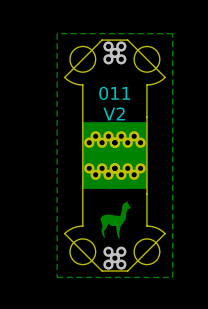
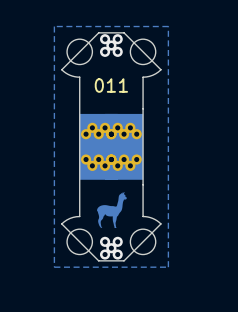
text: V2 (114, 113) -> none

